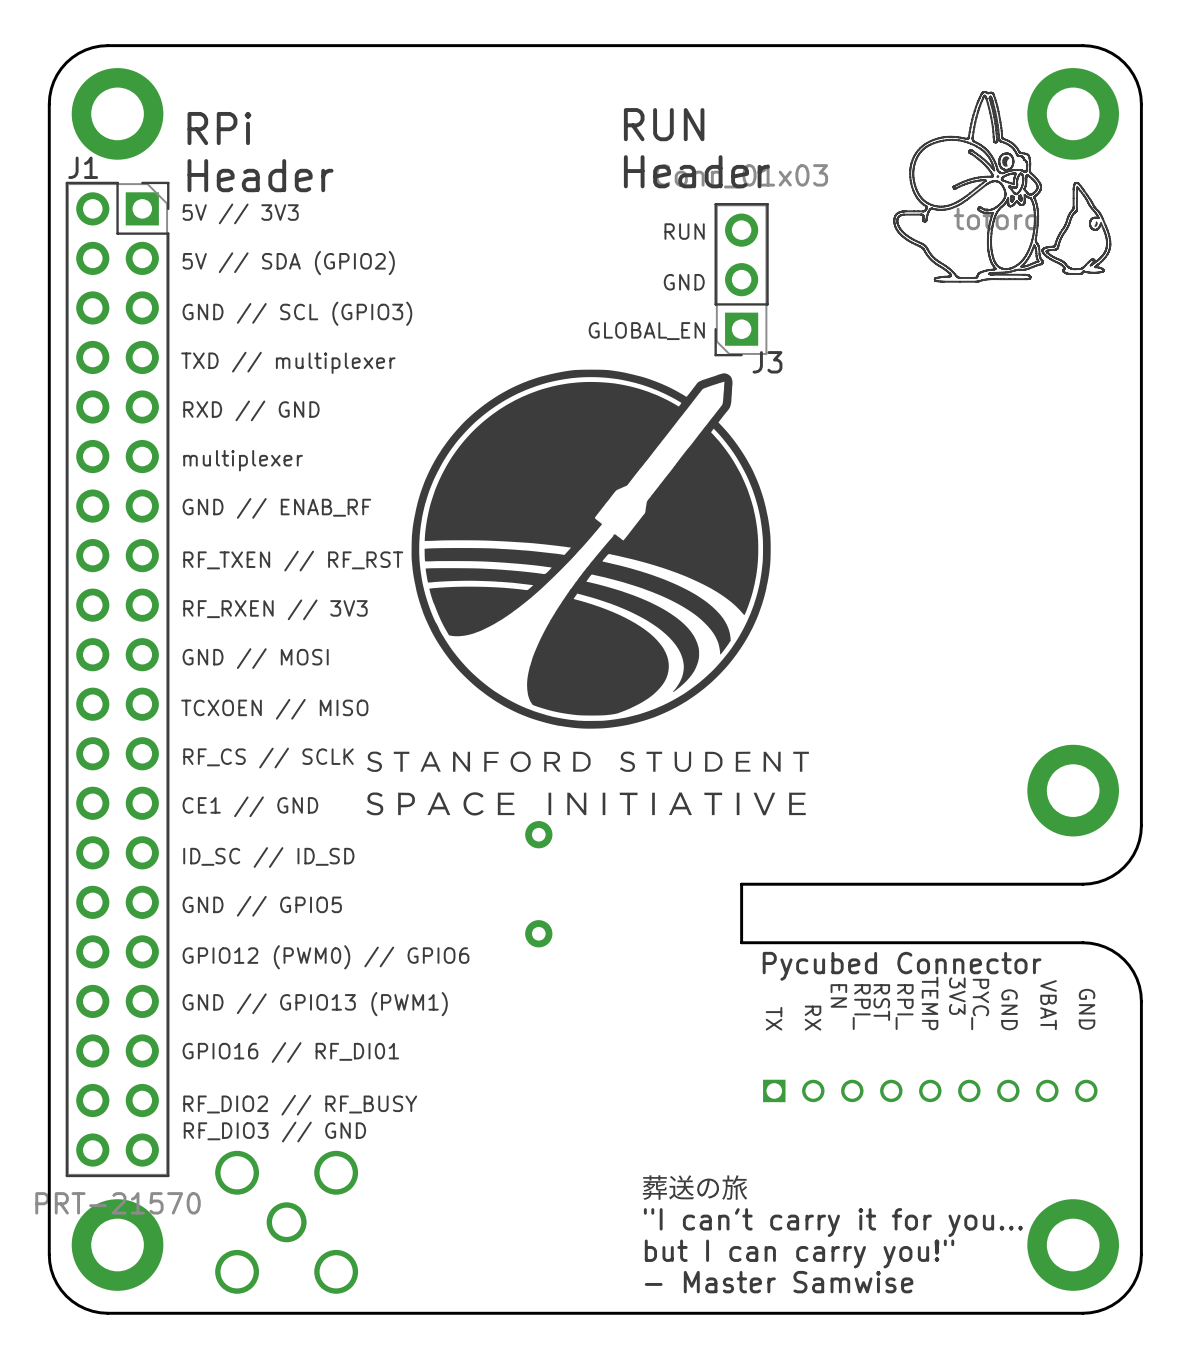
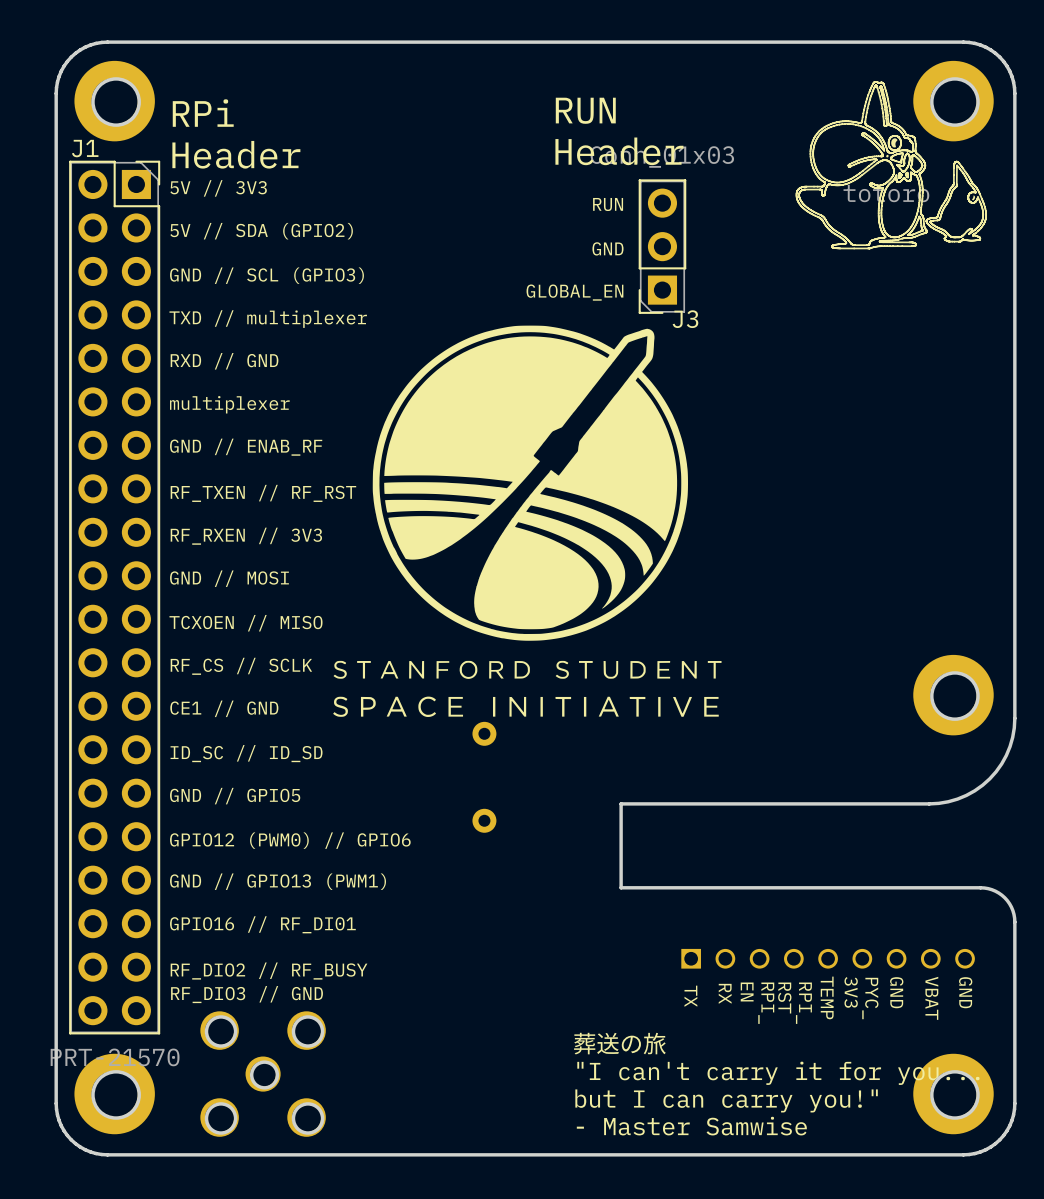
board edge: (1082, 45) (107, 45) (85, 50) (72, 57) (61, 68) (51, 88) (49, 104) (49, 1254) (51, 1269) (57, 1284) (72, 1301) (92, 1311) (107, 1313) (1082, 1313) (1105, 1308) (1118, 1301) (1129, 1290) (1139, 1269) (1141, 1254) (1141, 1001) (1136, 978) (1124, 959) (1105, 947) (1082, 942) (741, 942) (741, 884) (1090, 883) (1105, 879) (1118, 872) (1129, 861) (1136, 848) (1141, 825) (1140, 96) (1136, 81) (1124, 62) (1105, 50) (1082, 45) -> (963, 42) (985, 47) (999, 57) (1009, 71) (1014, 87) (1014, 718) (1010, 746) (1001, 763) (982, 785) (966, 795) (938, 803) (621, 803) (621, 887) (980, 887) (998, 893) (1009, 903) (1014, 922) (1014, 1103) (1011, 1120) (1003, 1135) (985, 1149) (963, 1154) (107, 1154) (90, 1151) (75, 1143) (61, 1125) (56, 1103) (56, 93) (59, 76) (67, 61) (85, 47) (107, 42) (963, 42)
round board edge: none -> [91, 77, 141, 127]
round board edge: none -> [930, 77, 980, 127]
round board edge: none -> [930, 671, 980, 721]
text: Pycubed Connector (902, 966) -> none
text position: EN (838, 995) -> EN (747, 991)
text position: 3V3 (957, 996) -> 3V3 (851, 992)
text position: RST (881, 1002) -> RST (784, 998)
text position: TEMP (930, 1003) -> TEMP (827, 997)
text position: PYC_ (980, 1004) -> PYC_ (870, 998)
text position: VBAT (1048, 1005) -> VBAT (931, 998)
text: RPI_ (861, 1007) -> none
text: RPI_ (904, 1007) -> none
text: GND (1009, 1009) -> none
text: GND (1087, 1009) -> none
text position: TX (774, 1018) -> TX (690, 996)
text position: RX (813, 1018) -> RX (725, 993)
text: none -> GND (896, 992)
text: none -> GND (965, 992)
text: none -> RPI_ (766, 1003)
text: none -> RPI_ (803, 1003)
round board edge: none -> [204, 1015, 238, 1048]
round board edge: none -> [291, 1015, 325, 1048]
round board edge: none -> [249, 1060, 280, 1090]
round board edge: none -> [91, 1070, 141, 1120]
round board edge: none -> [930, 1070, 980, 1120]
round board edge: none -> [204, 1102, 238, 1135]
round board edge: none -> [291, 1102, 325, 1135]

